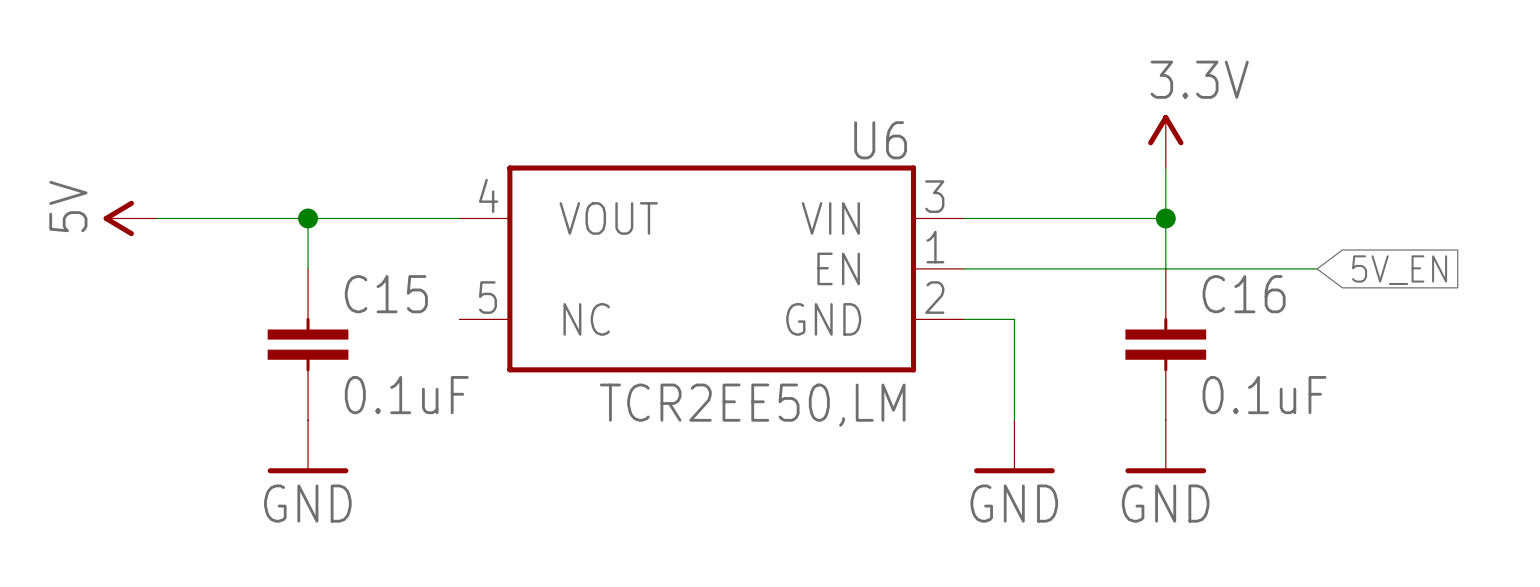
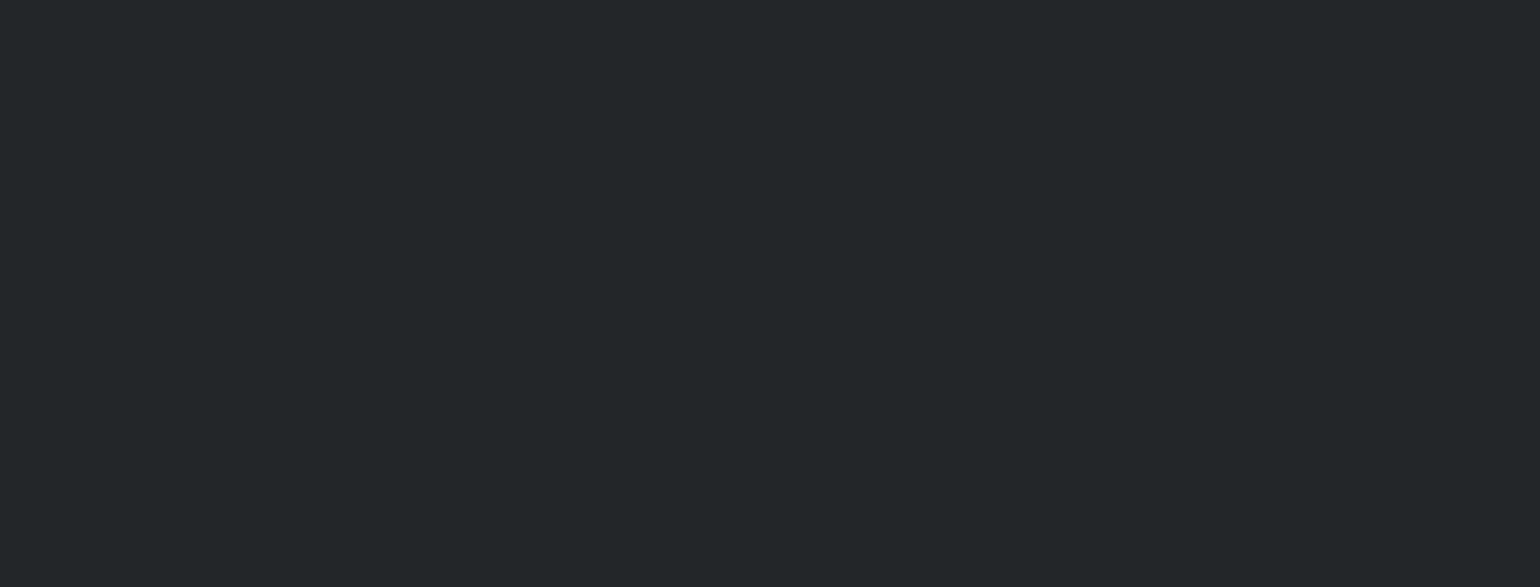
power symbol: 3.3V (1165, 141) -> none
wire: (1165, 168) (1165, 268) -> none
power symbol: 5V (130, 218) -> none
wire: (156, 218) (459, 218) -> none
wire: (308, 218) (308, 268) -> none
junction: (308, 218) -> none
wire: (963, 218) (1165, 218) -> none
junction: (1165, 218) -> none
U6: TCR2EE50,LM (711, 268) -> none
wire: (963, 268) (1317, 268) -> none
global label: 5V_EN (1399, 270) -> none
wire: (963, 319) (1014, 319) (1014, 420) -> none
C15: 0.1uF (308, 344) -> none
C16: 0.1uF (1165, 344) -> none
power symbol: GND (308, 446) -> none
power symbol: GND (1014, 446) -> none
power symbol: GND (1165, 446) -> none

